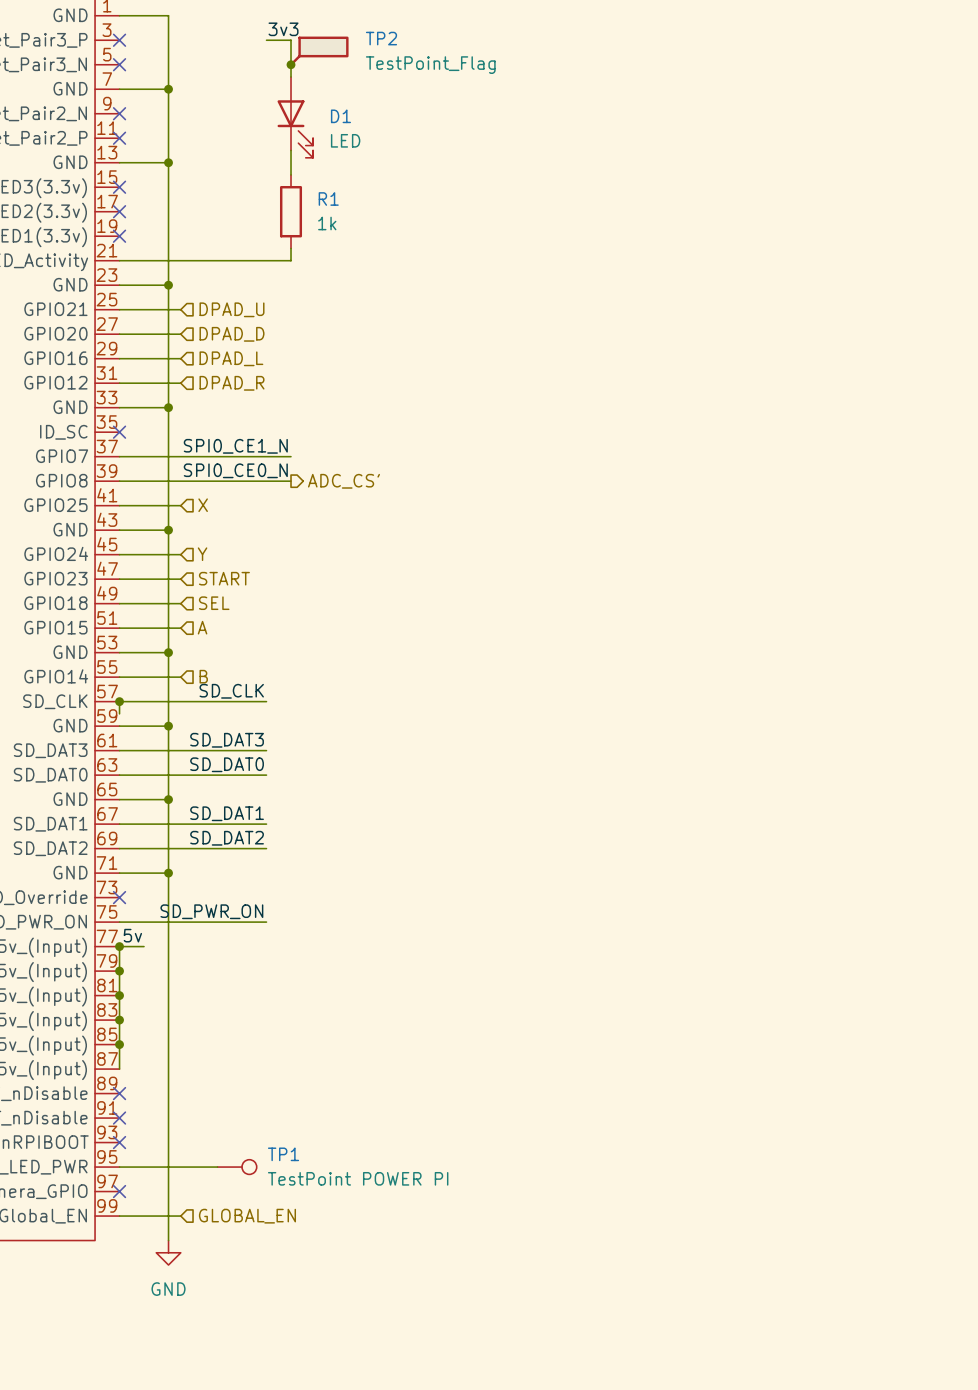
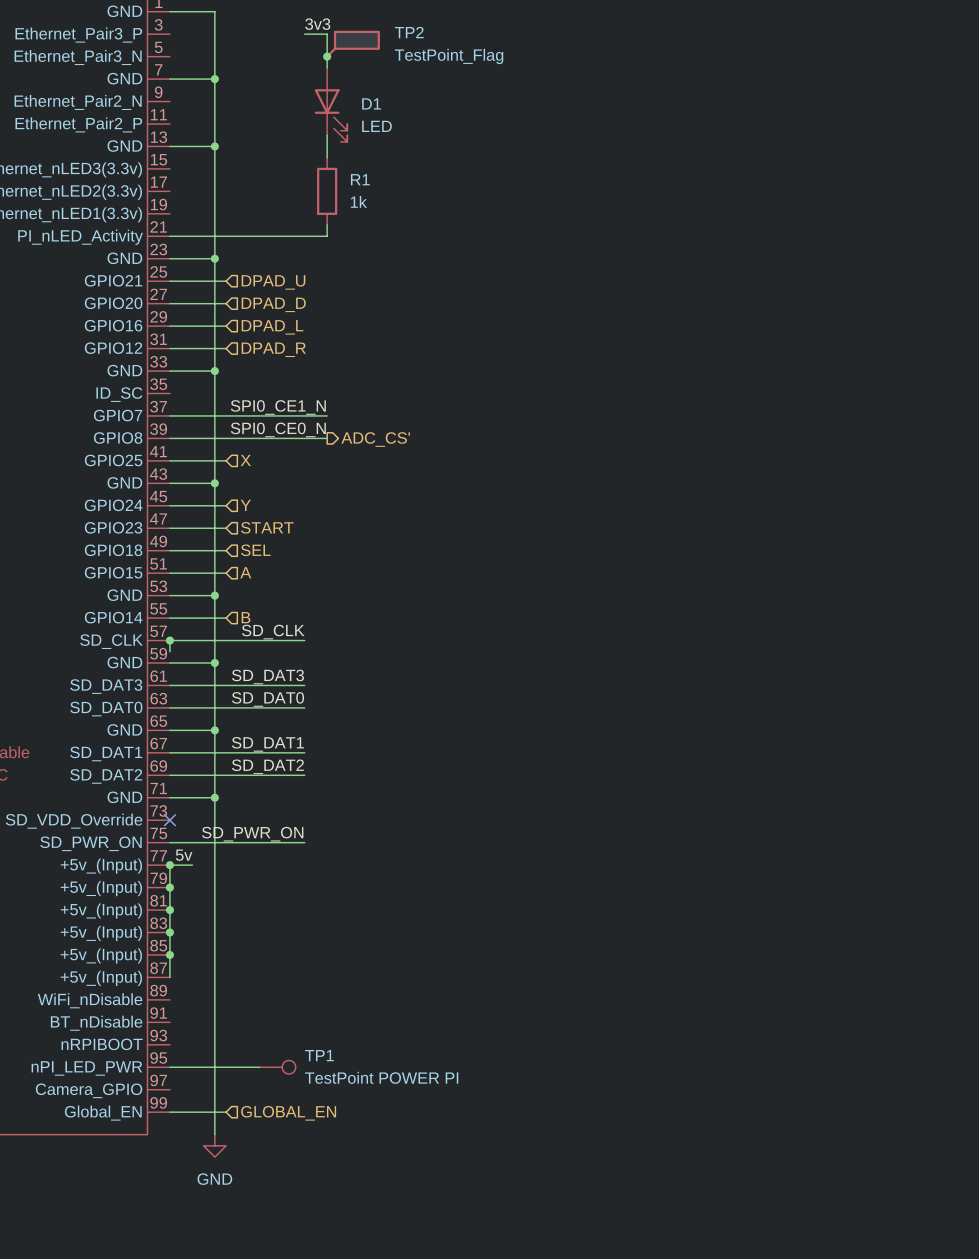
no-connect mark: (119, 40) -> none
no-connect mark: (119, 64) -> none
no-connect mark: (119, 113) -> none
no-connect mark: (119, 138) -> none
no-connect mark: (119, 187) -> none
no-connect mark: (119, 211) -> none
no-connect mark: (119, 236) -> none
no-connect mark: (119, 432) -> none
no-connect mark: (119, 1093) -> none
no-connect mark: (119, 1118) -> none
no-connect mark: (119, 1142) -> none
no-connect mark: (119, 1191) -> none

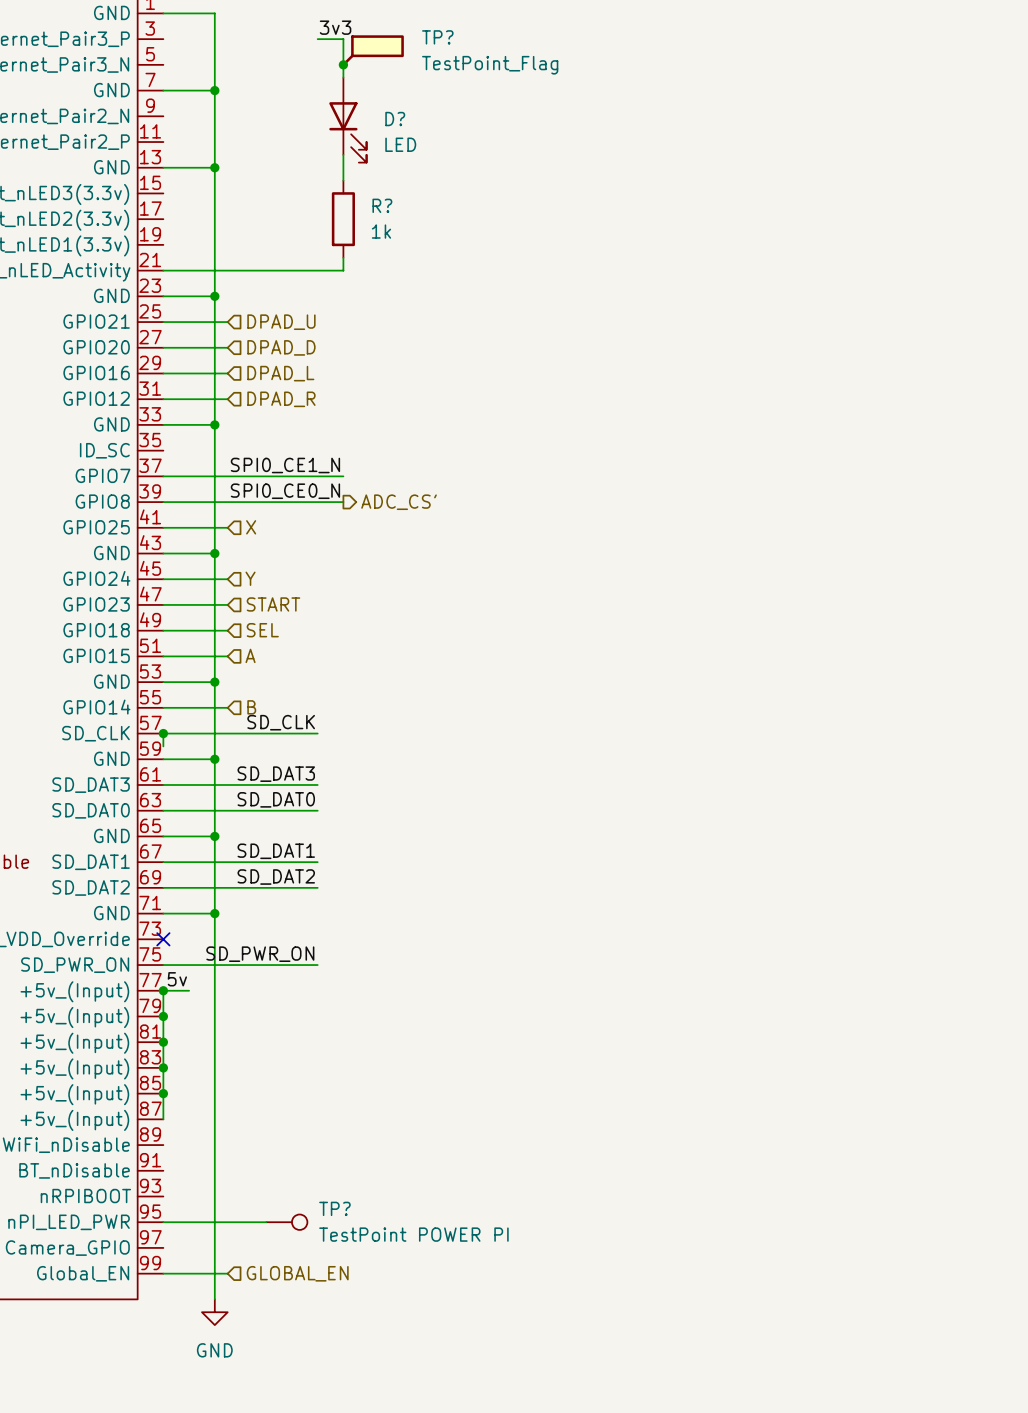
TP2 name: TP2 (409, 32) -> TP? (437, 37)
D1 name: D1 (371, 103) -> D? (395, 119)
R1 name: R1 (360, 179) -> R? (382, 205)
TP1 name: TP1 (319, 1055) -> TP? (334, 1208)

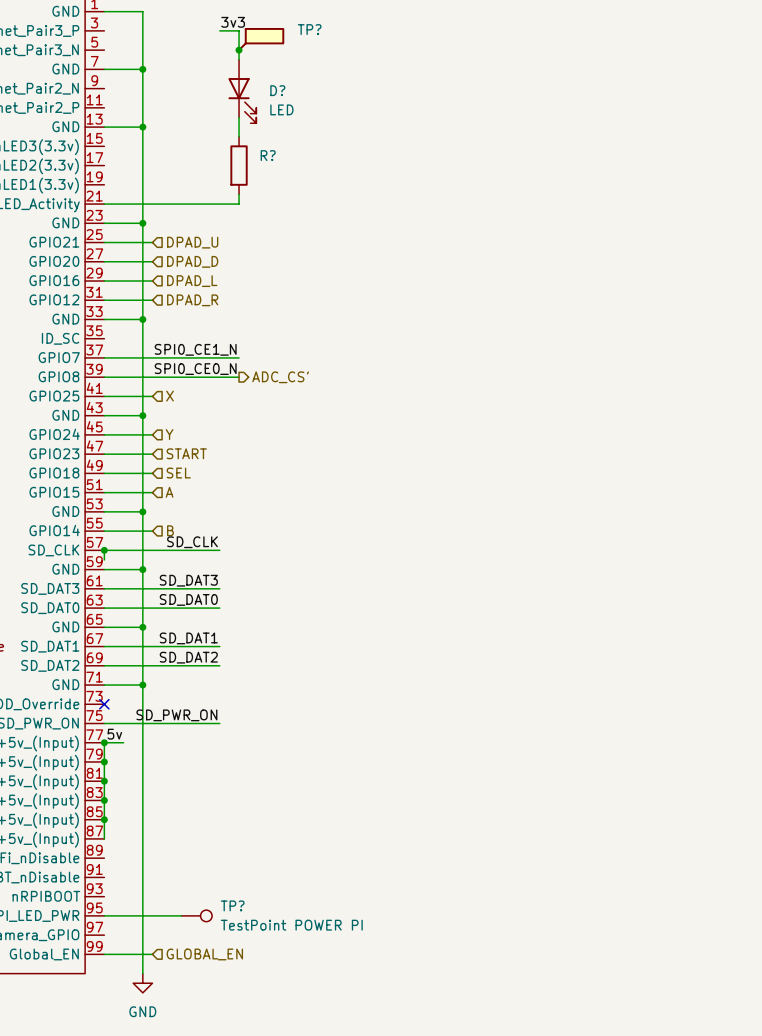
TP? value: TestPoint_Flag (490, 65) -> none
R? value: 1k (381, 231) -> none

